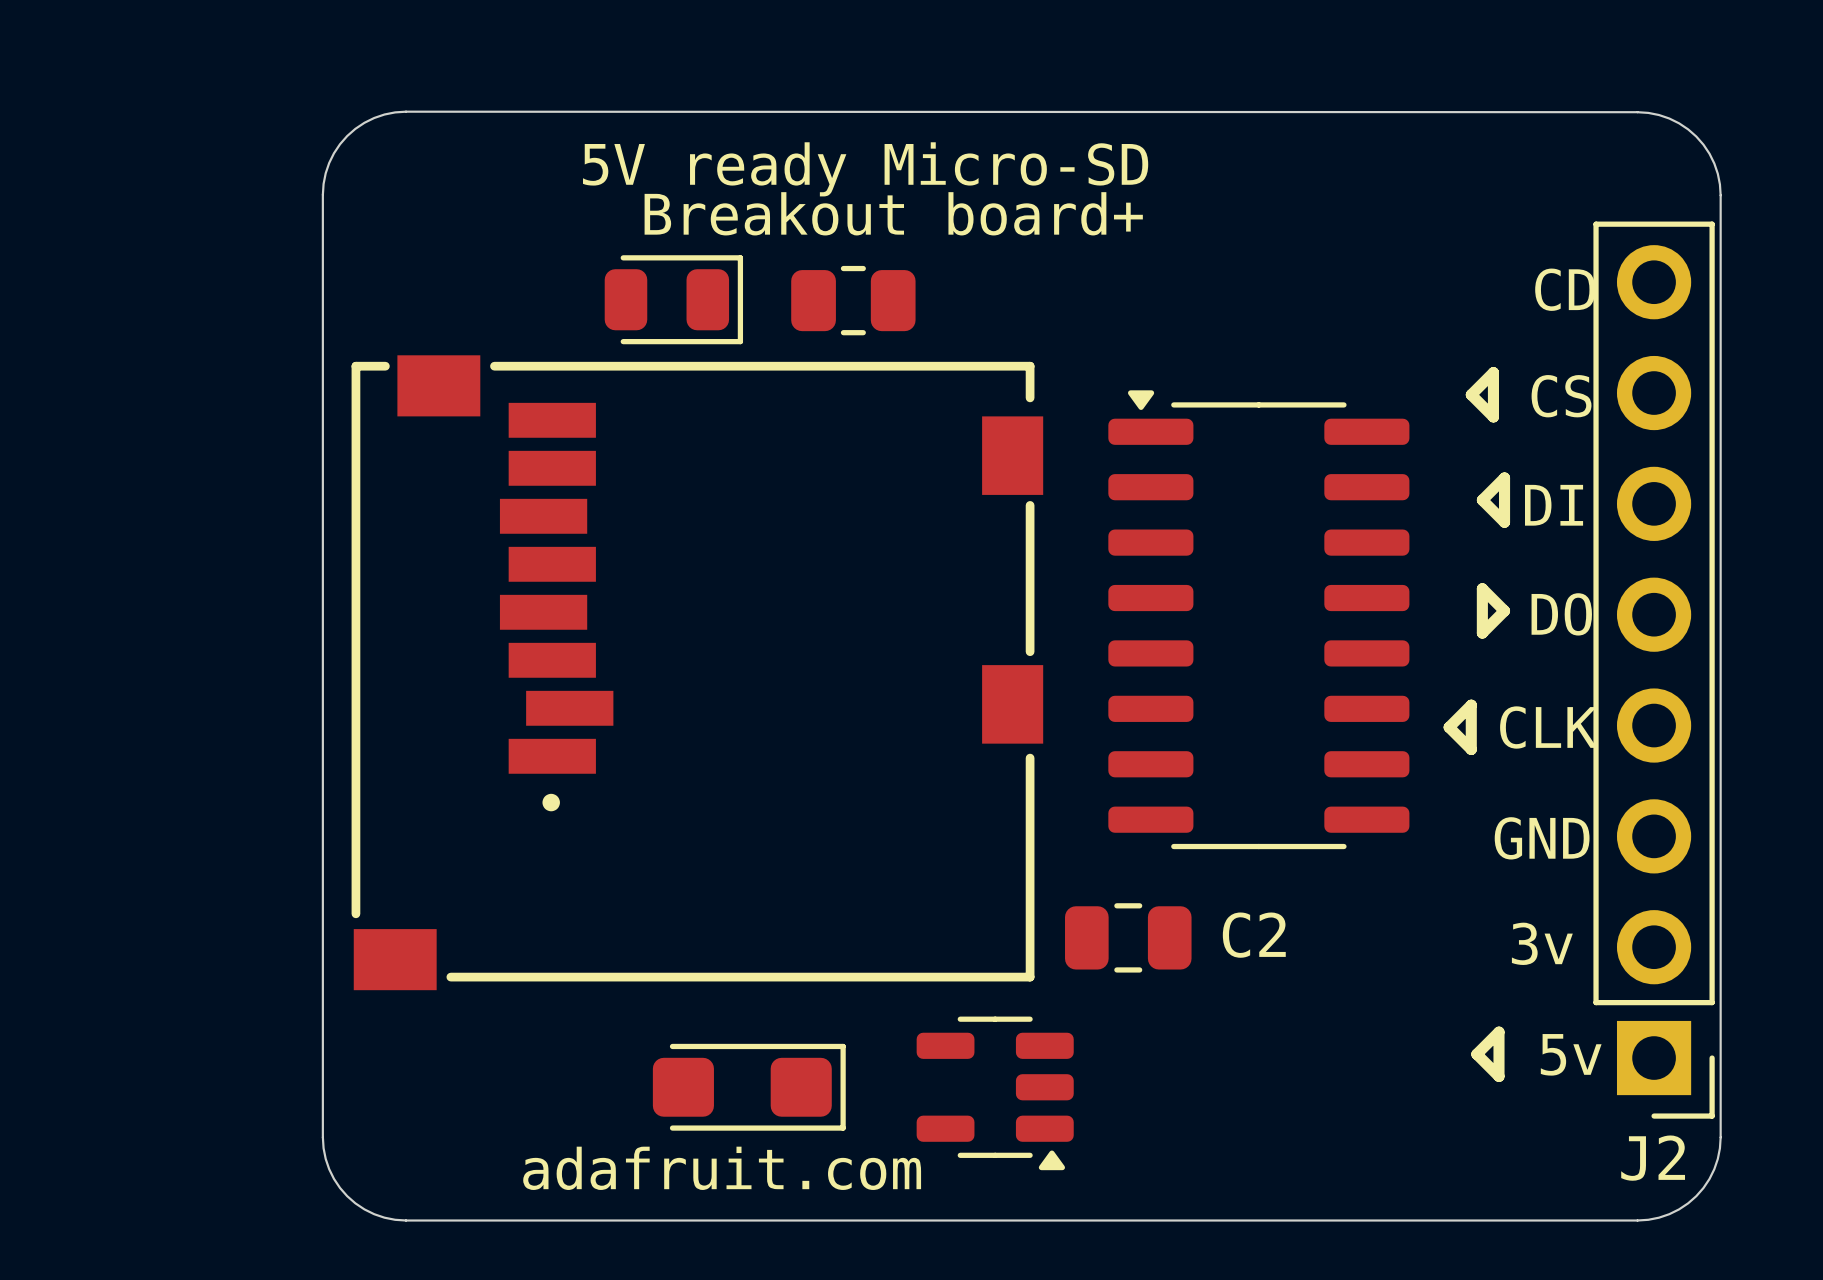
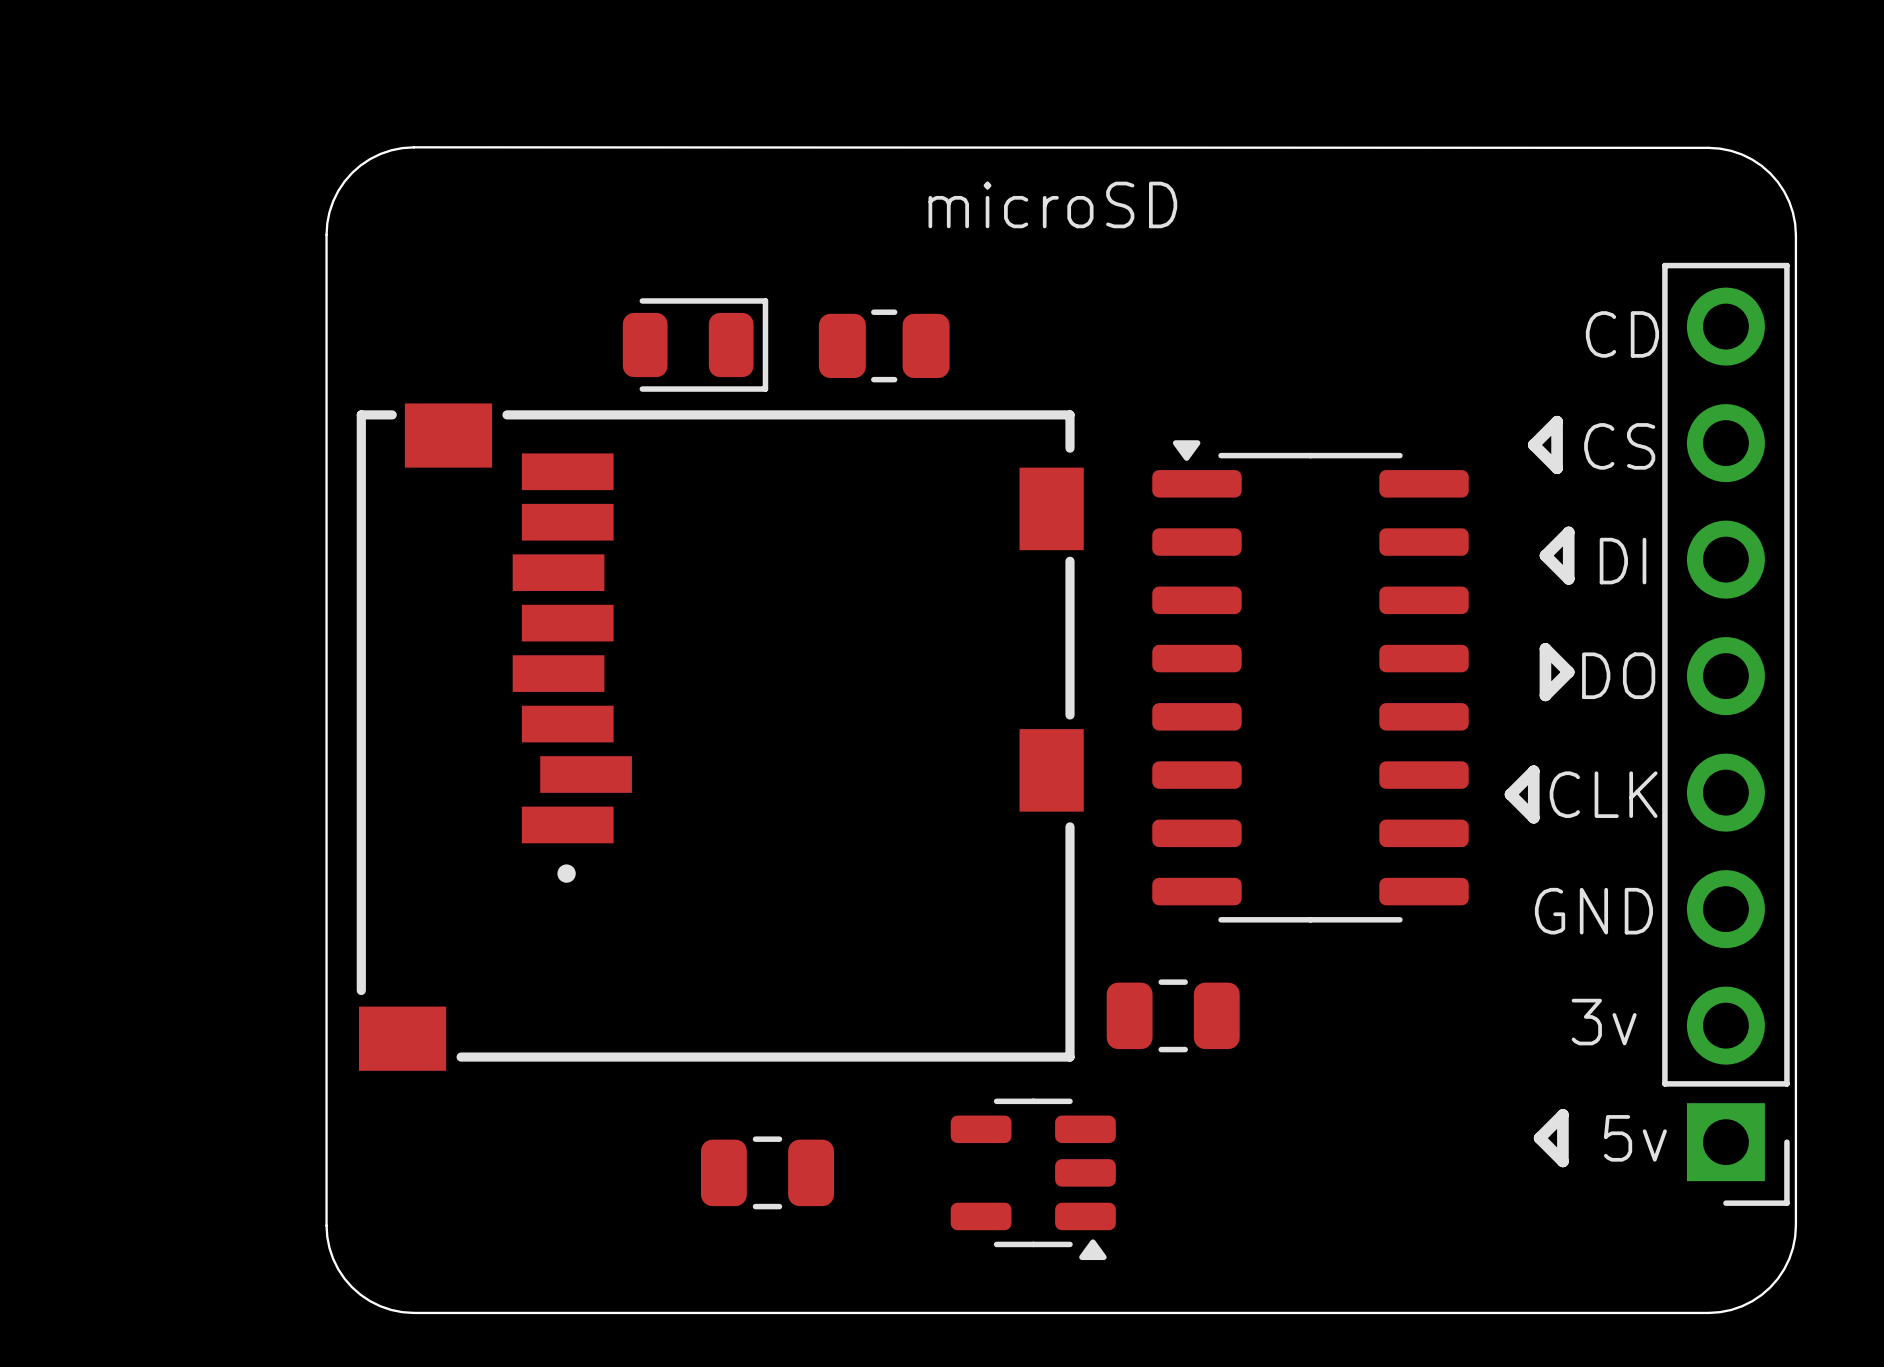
text: none -> microSD (1052, 204)
text: 5V ready Micro-SD (865, 169) -> none
text: Breakout board+ (893, 213) -> none
C2 name: C2 (1254, 935) -> none
part footprint: [652, 1043, 846, 1131] -> [700, 1136, 834, 1210]
J2 name: J2 (1653, 1158) -> none
text: adafruit.com (722, 1168) -> none

